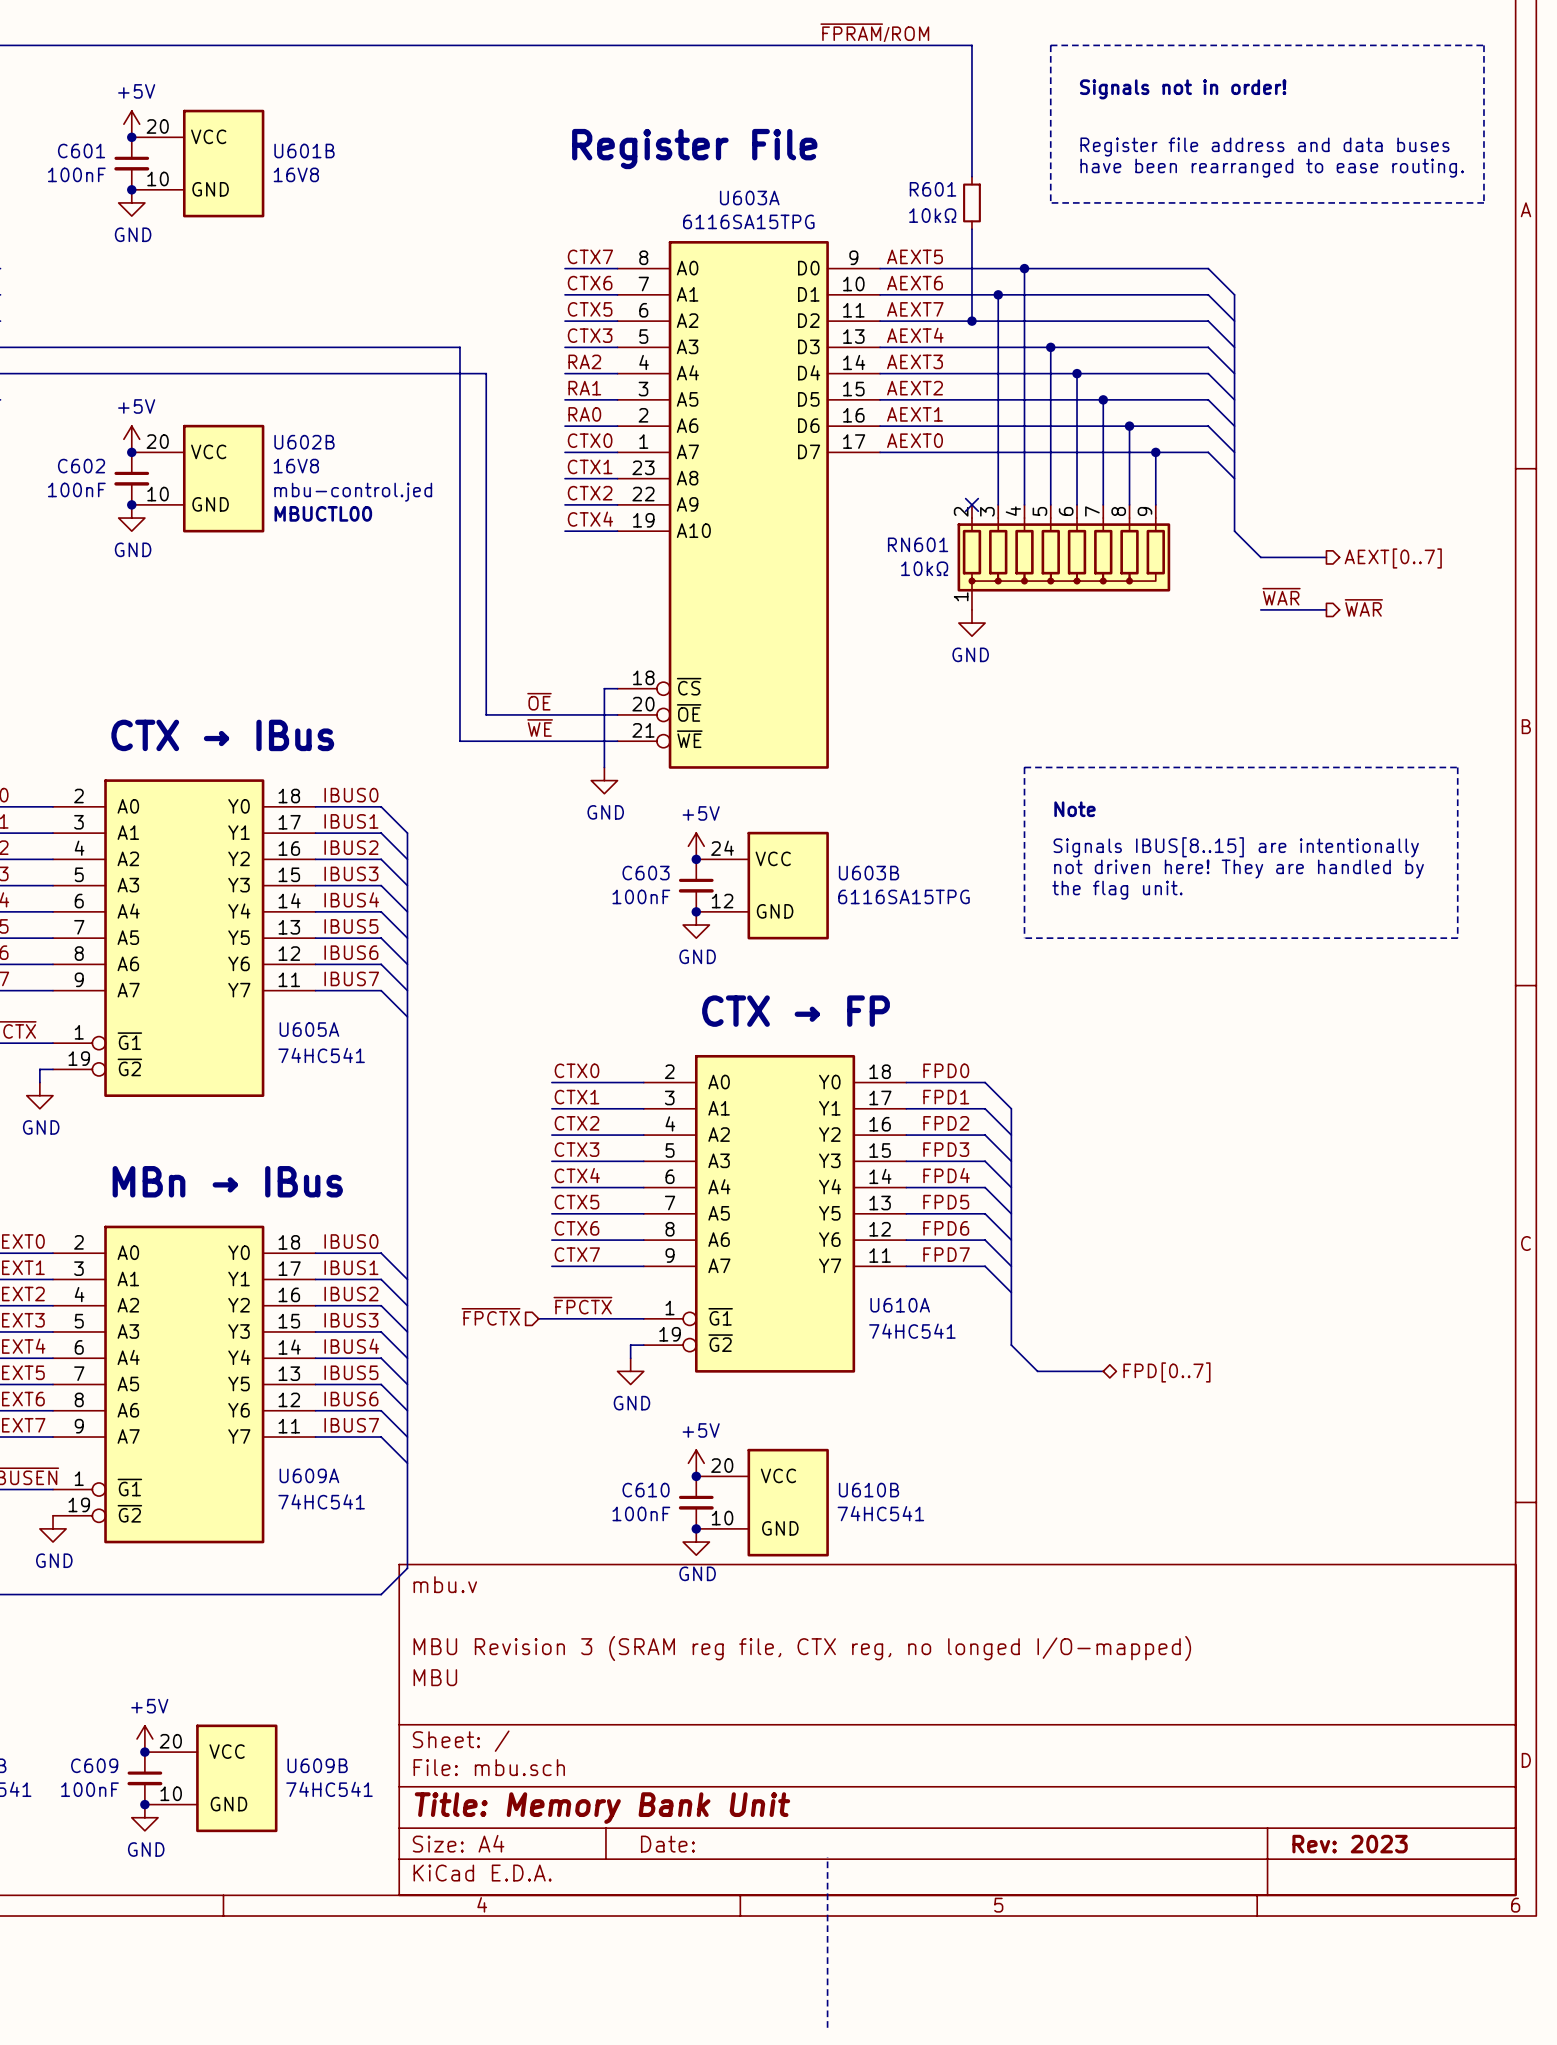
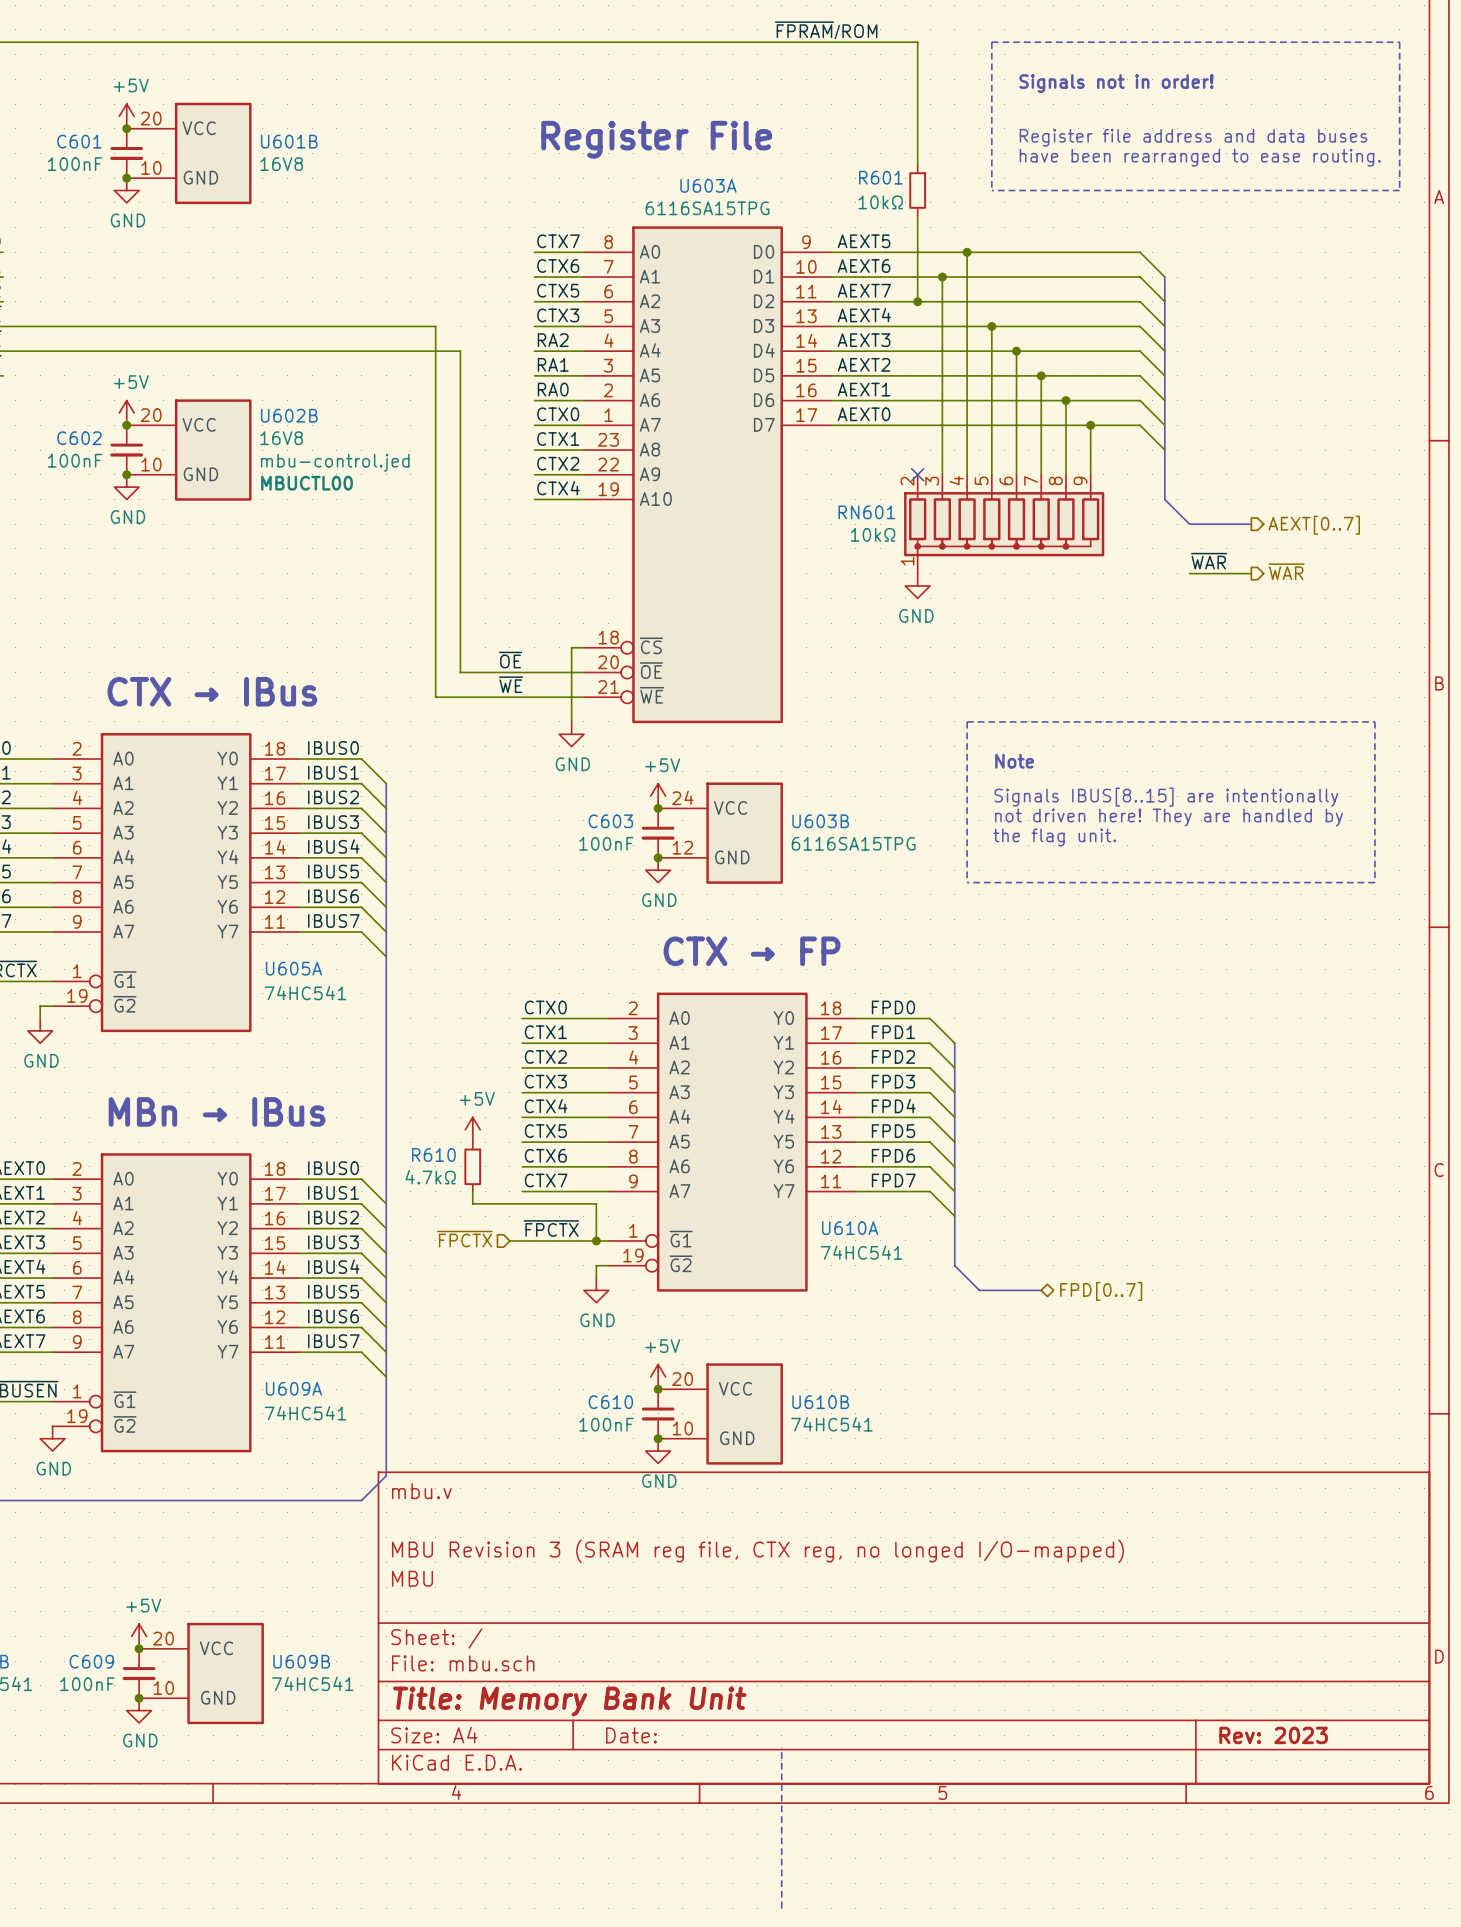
power symbol: none -> +5V (472, 1129)
R610: none -> 4.7kΩ (472, 1166)
wire: none -> (472, 1191) (472, 1203) (596, 1203) (596, 1240)
junction: none -> (596, 1240)

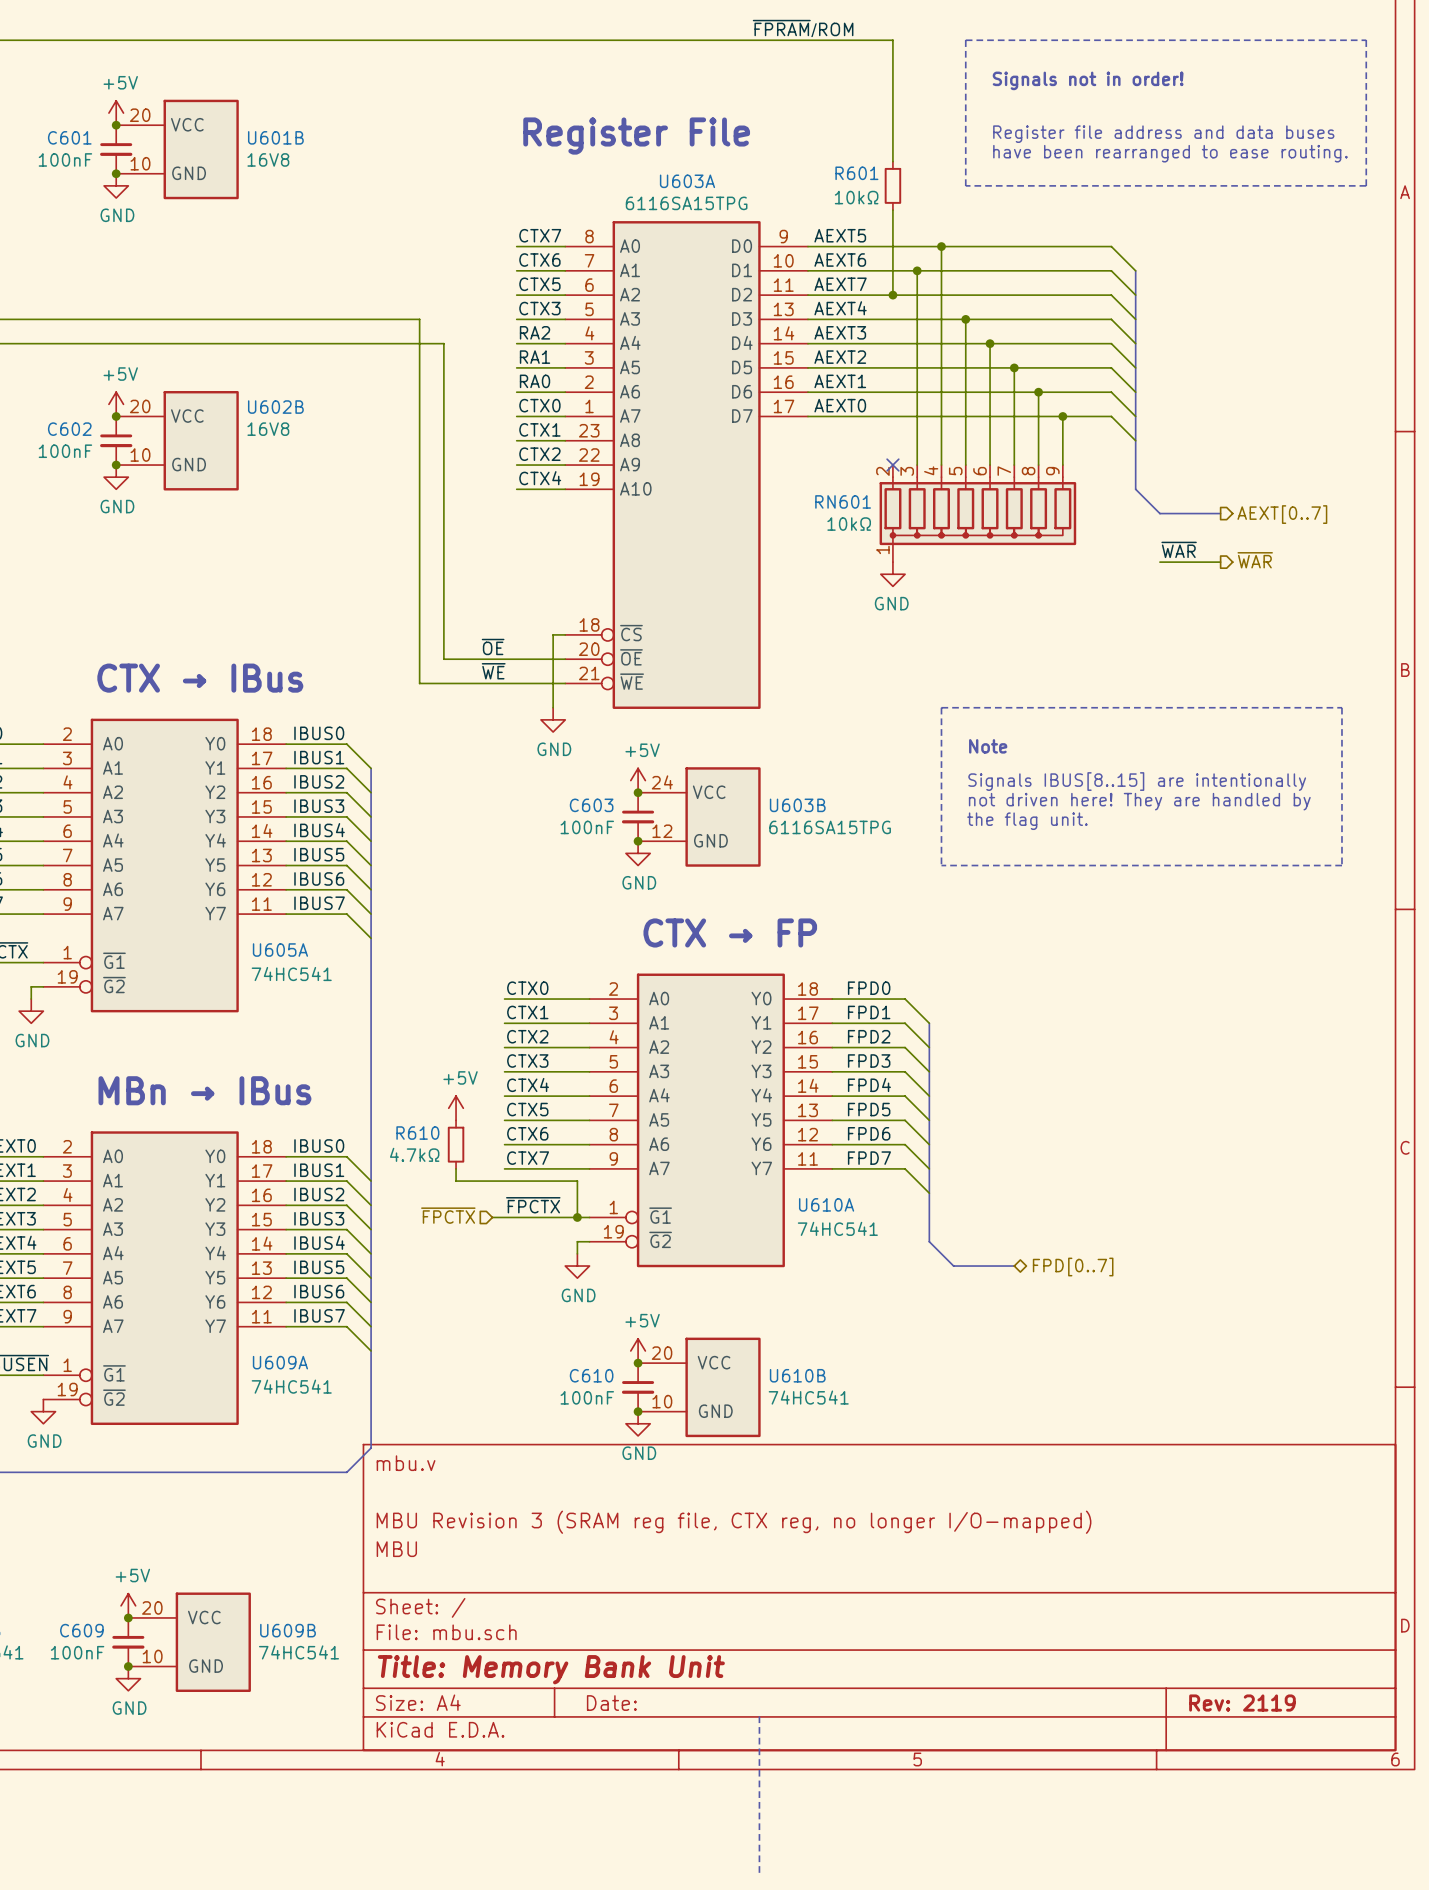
U602B text: mbu-control.jed (335, 462) -> none
U602B text: MBUCTL00 (307, 483) -> none
title block: MBU Revision 3 (SRAM reg file, CTX reg, no longed I/O-mapped) (757, 1551) -> MBU Revision 3 (SRAM reg file, CTX reg, no longer I/O-mapped) (734, 1522)
title block: Rev: 2023 (1273, 1735) -> Rev: 2119 (1242, 1703)

